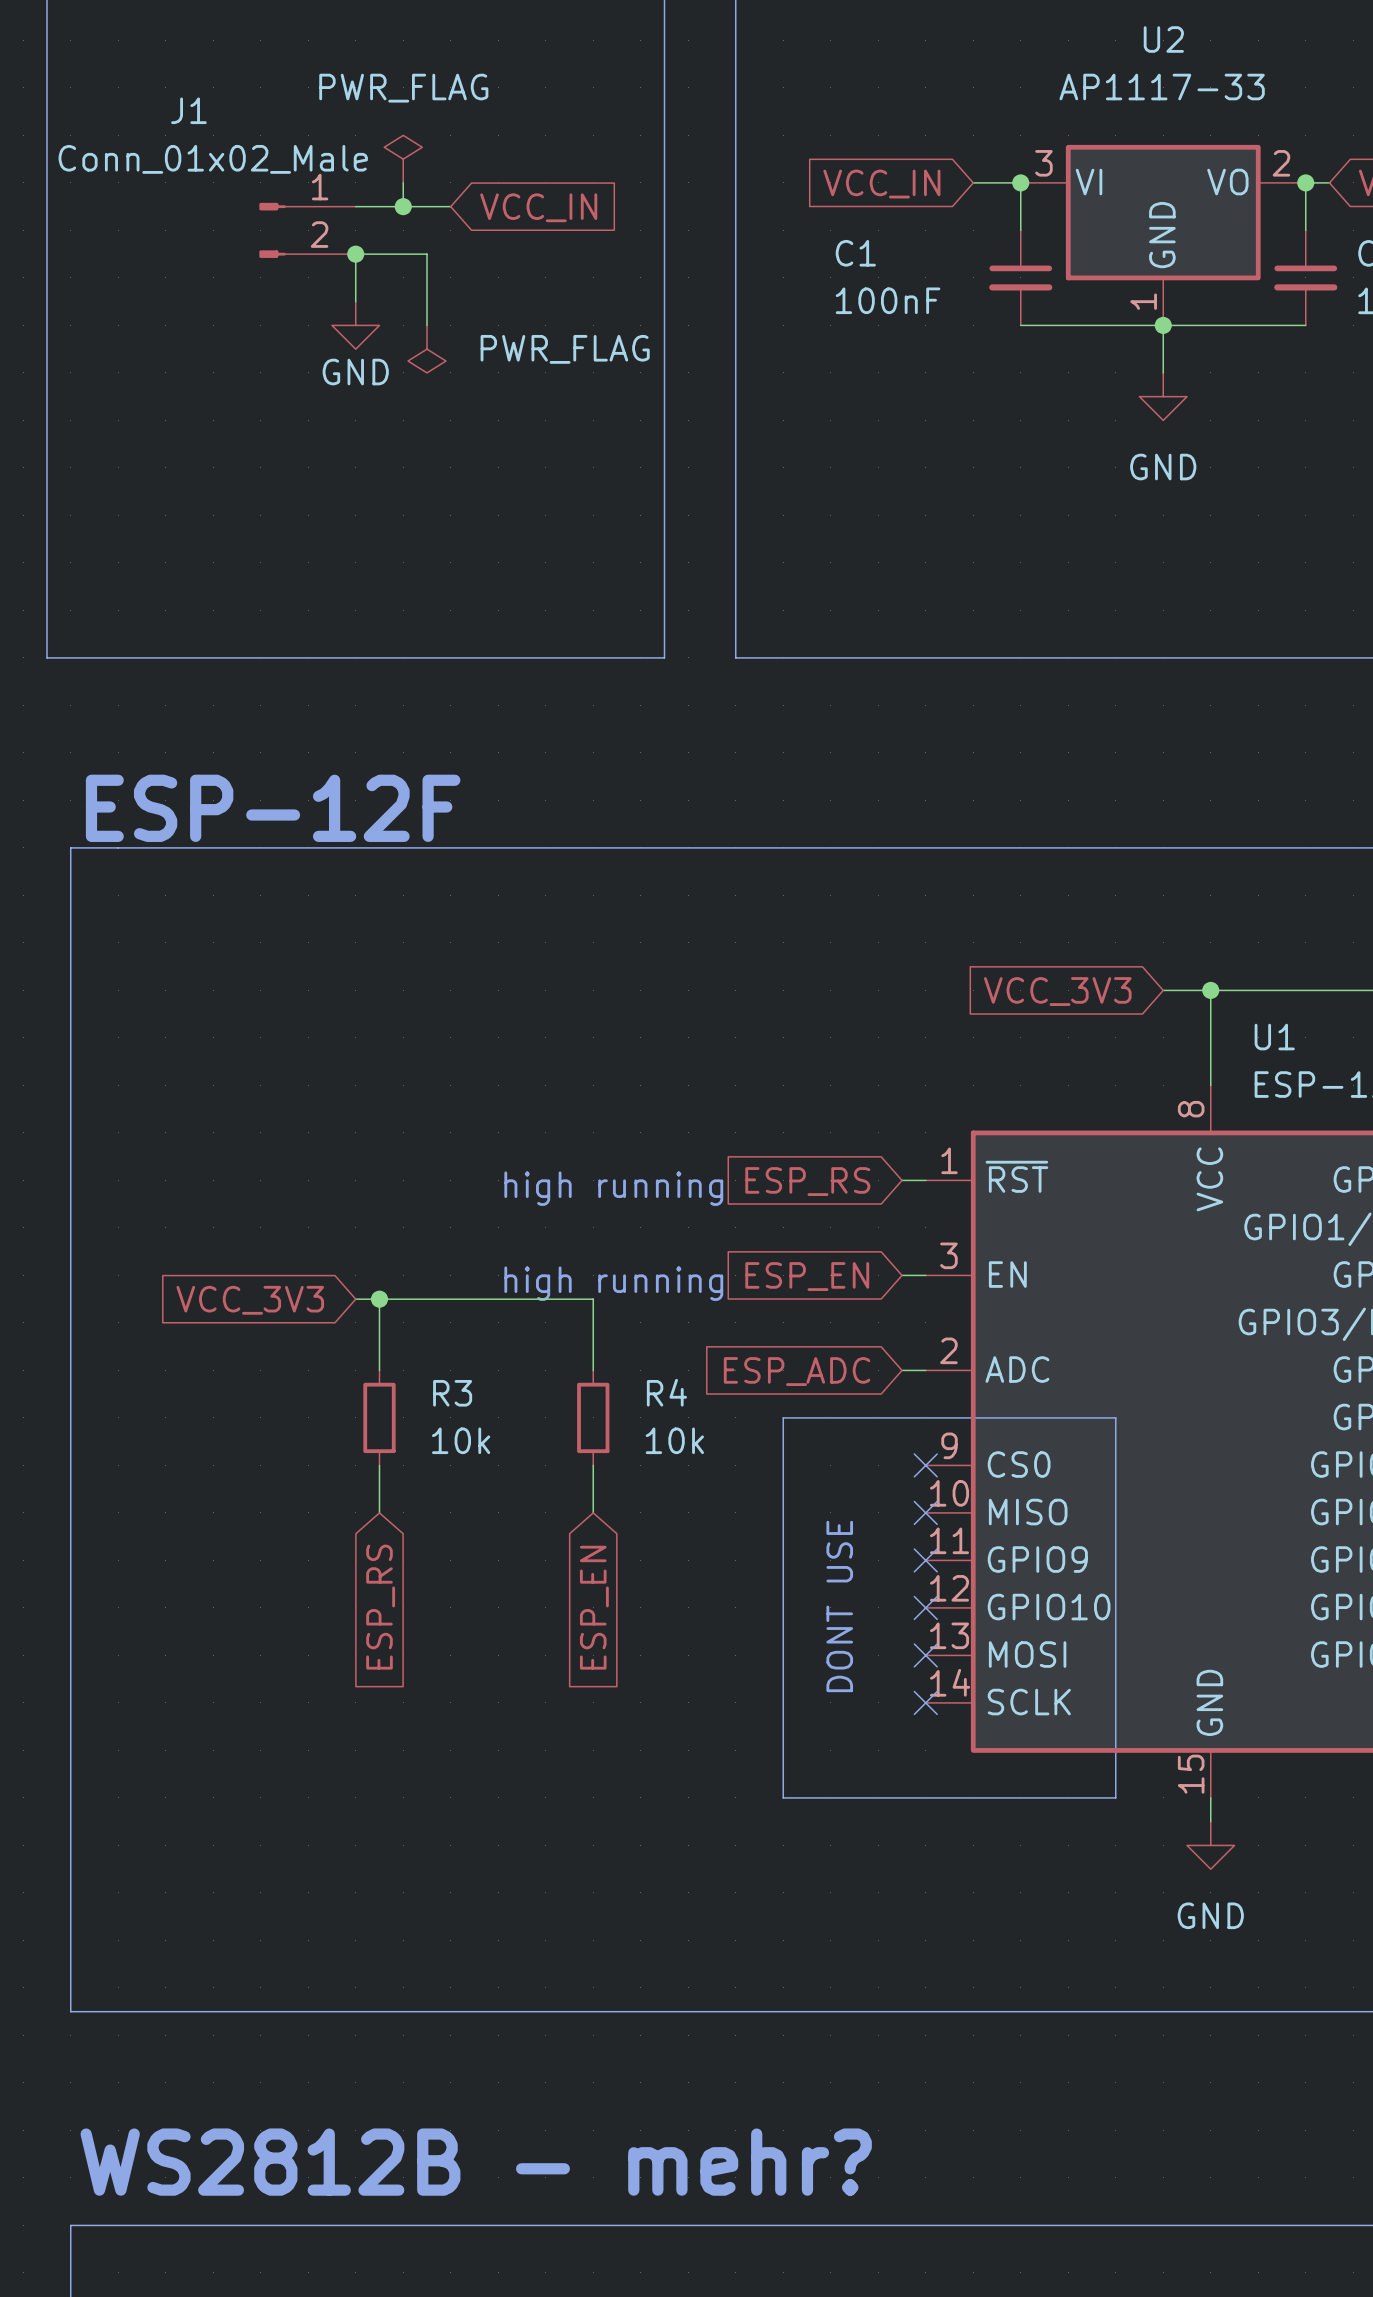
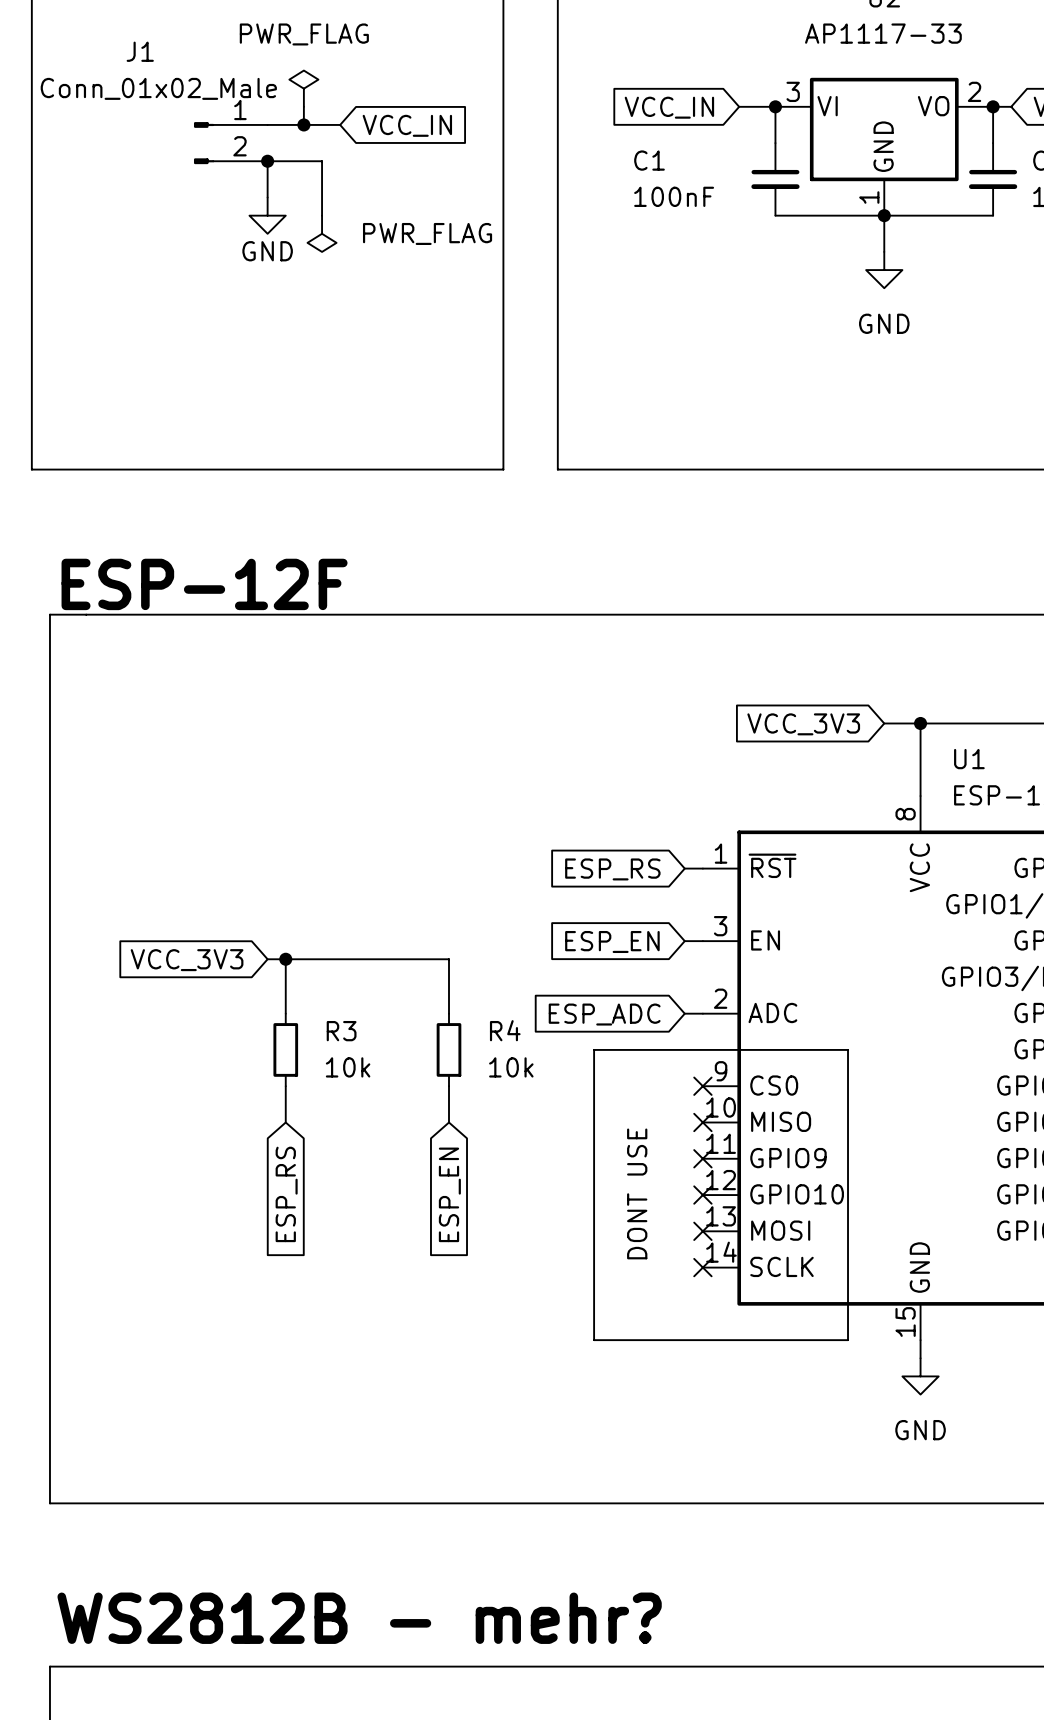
text: high running (613, 1188) -> none
text: high running (613, 1283) -> none

